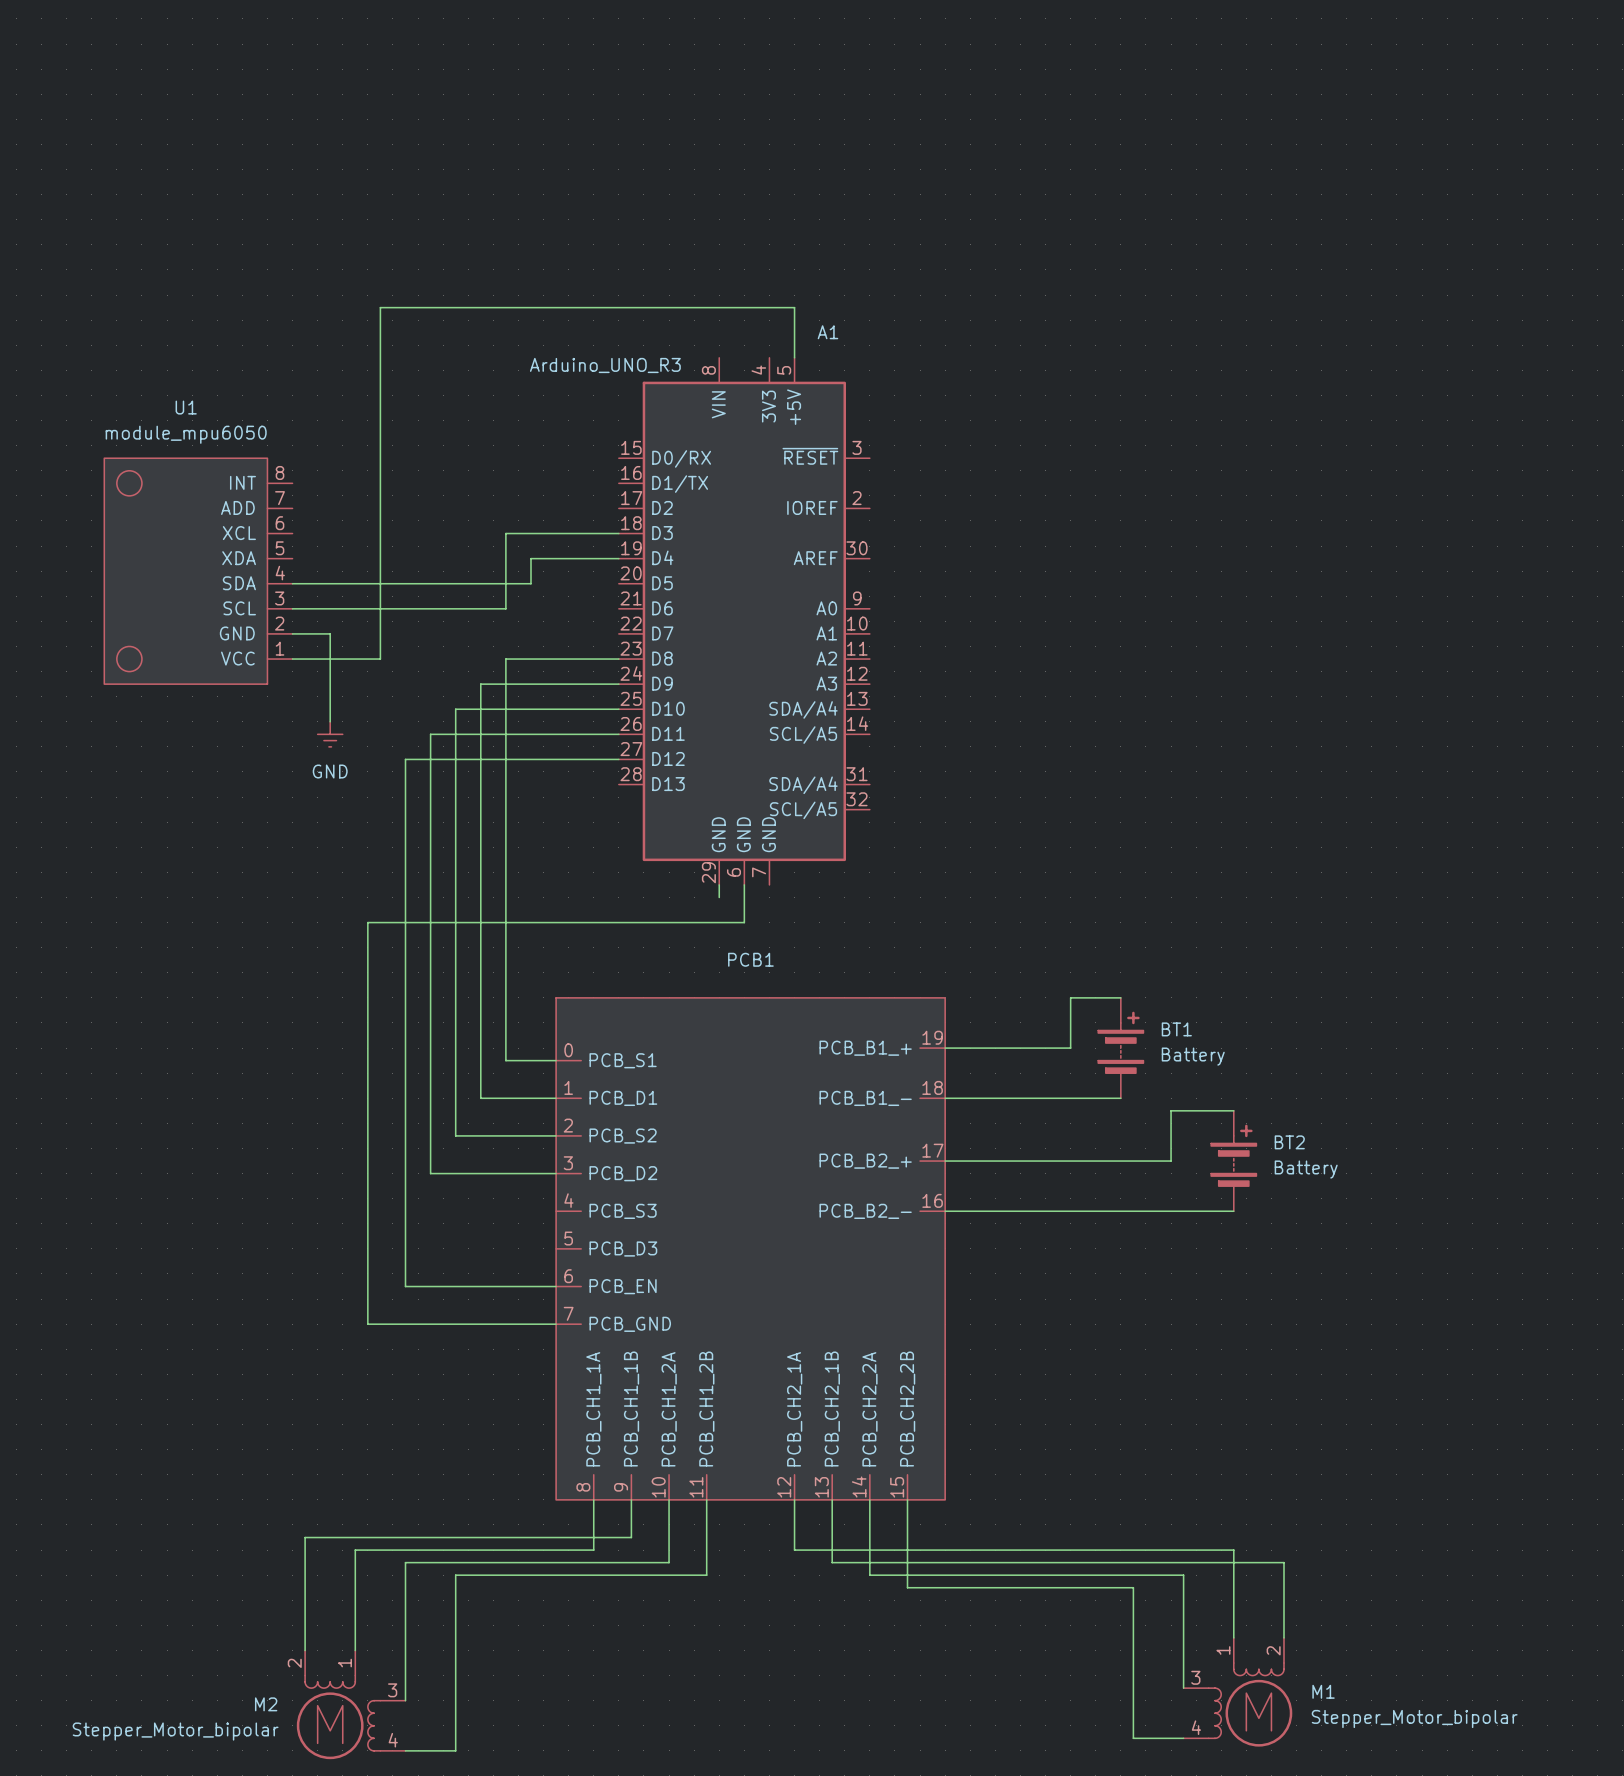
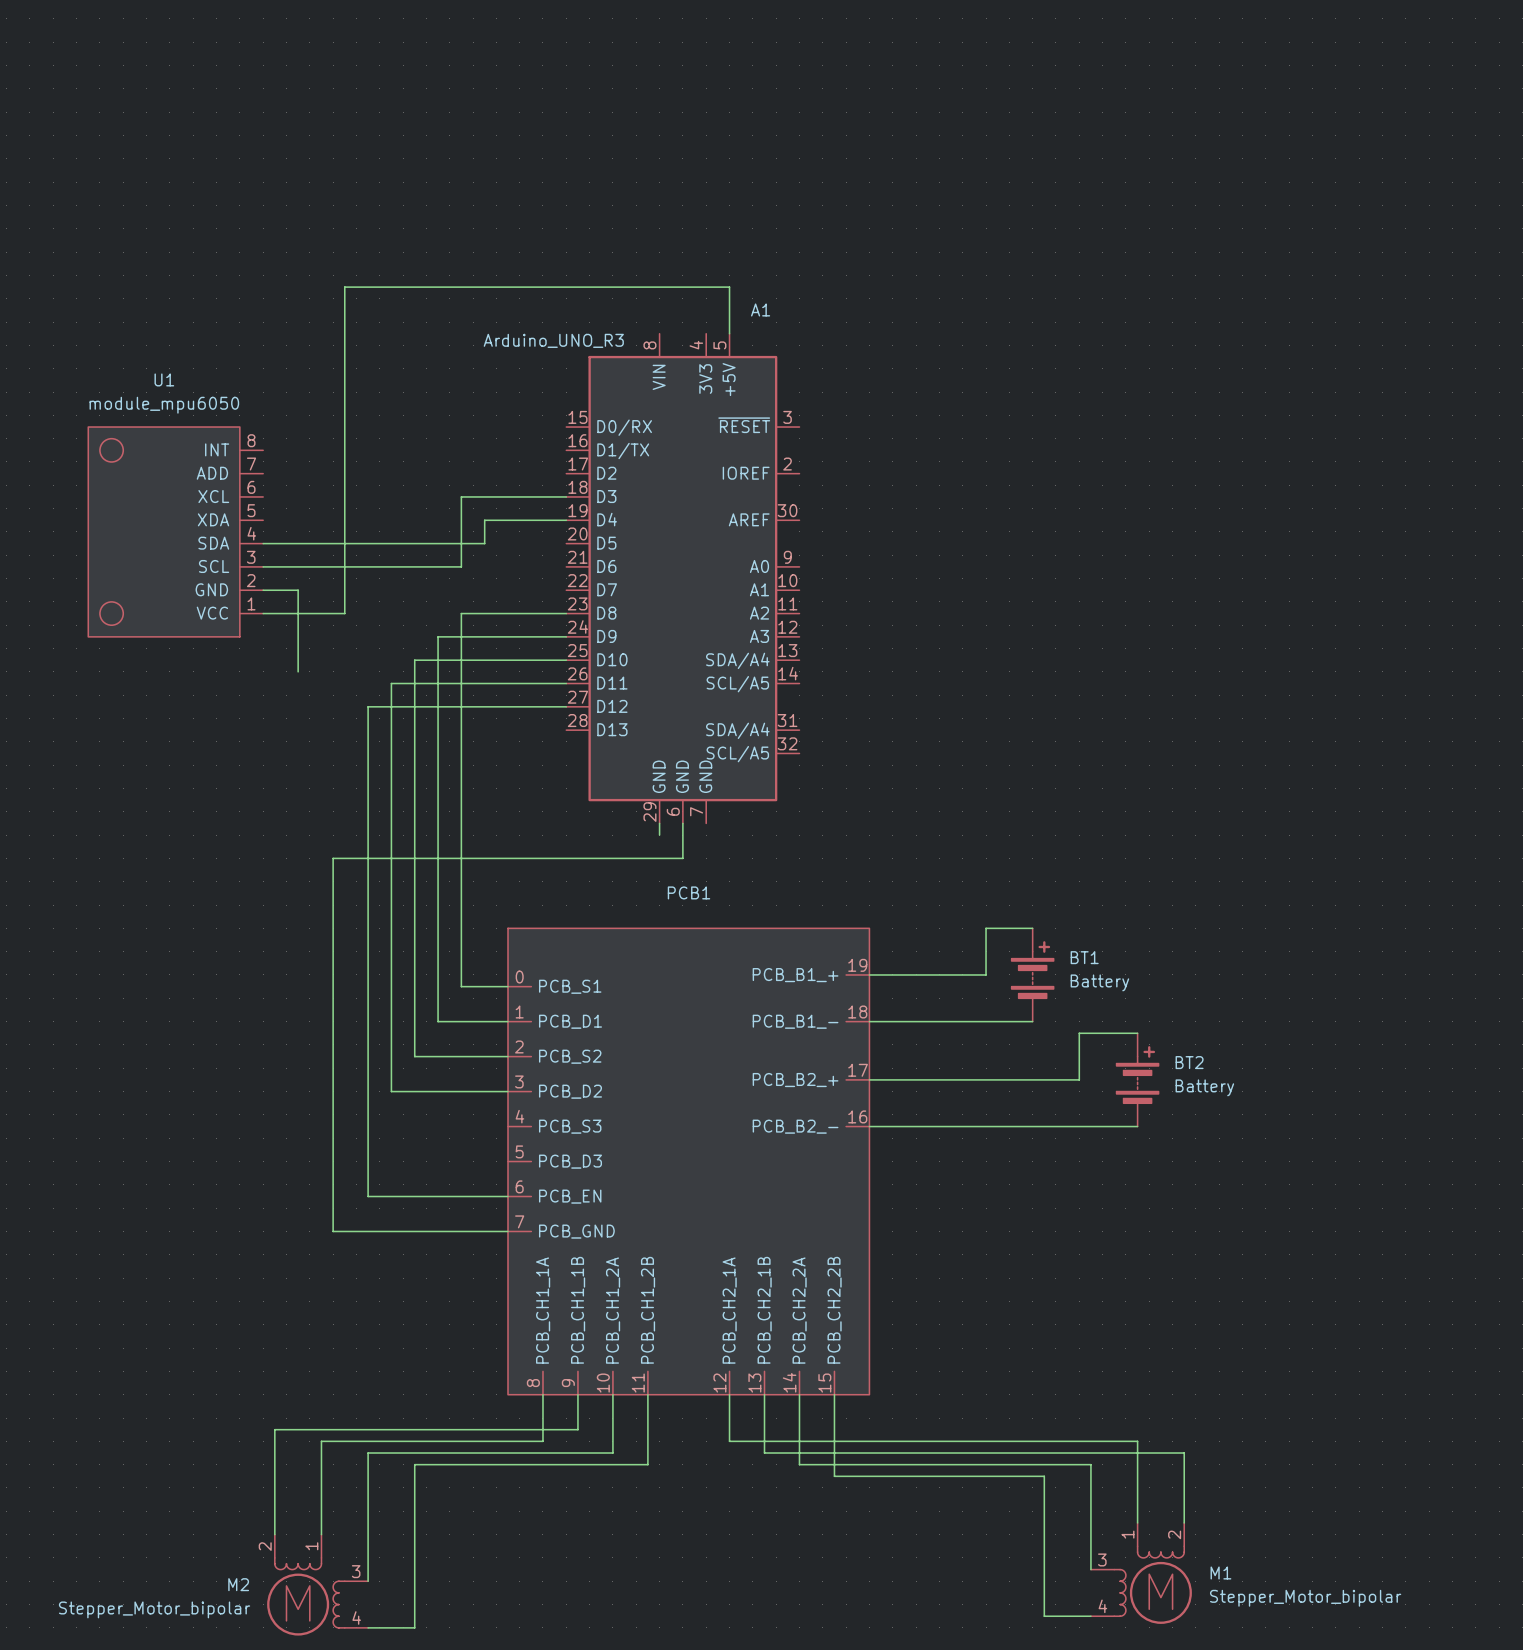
power symbol: GND (330, 734) -> none

